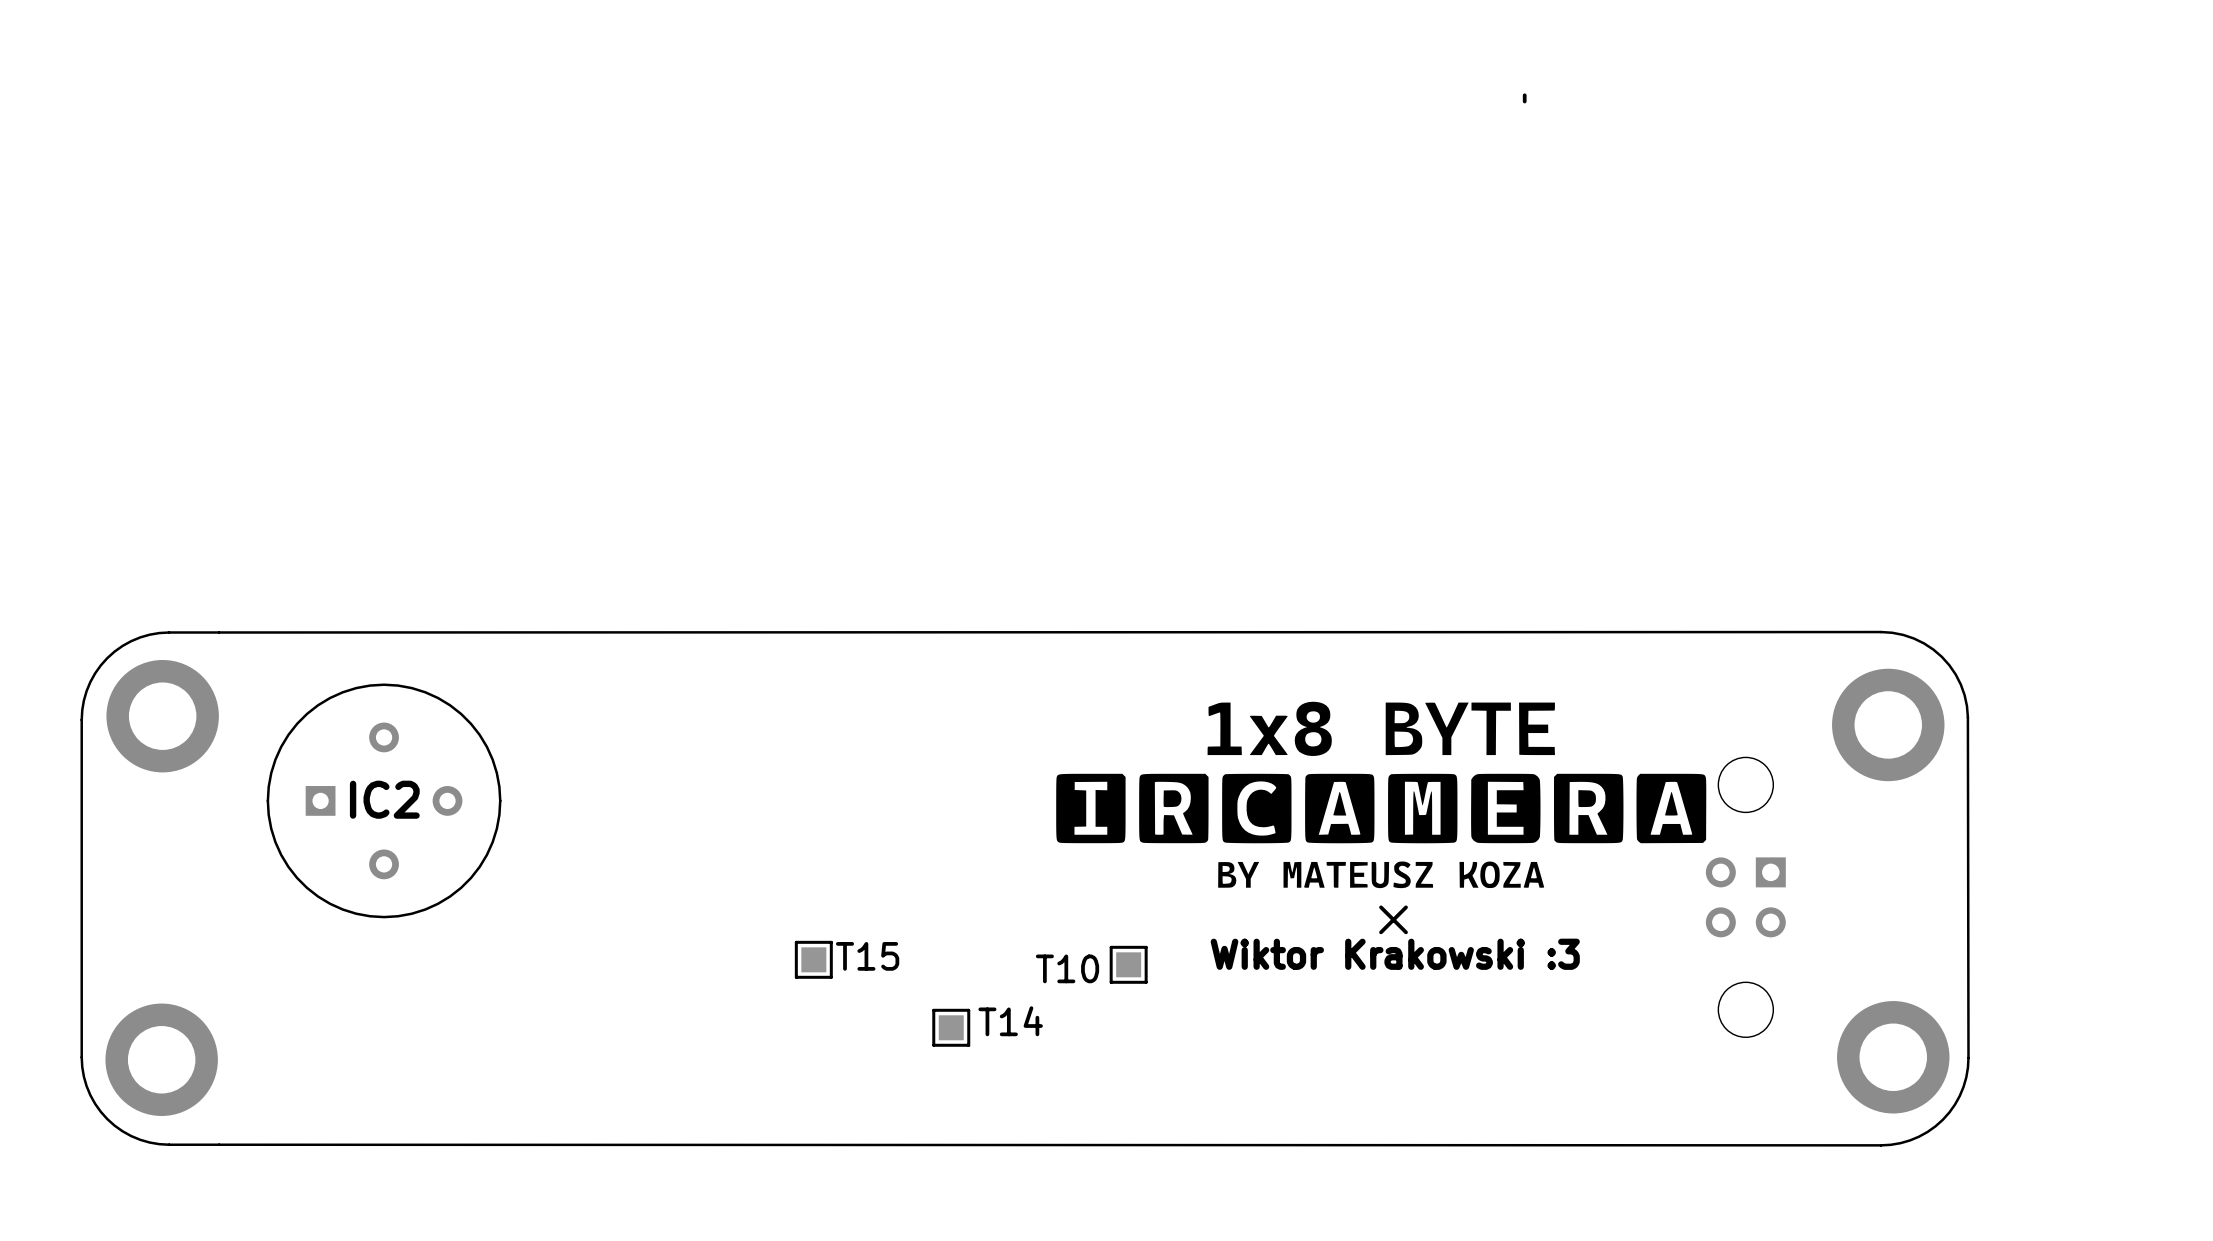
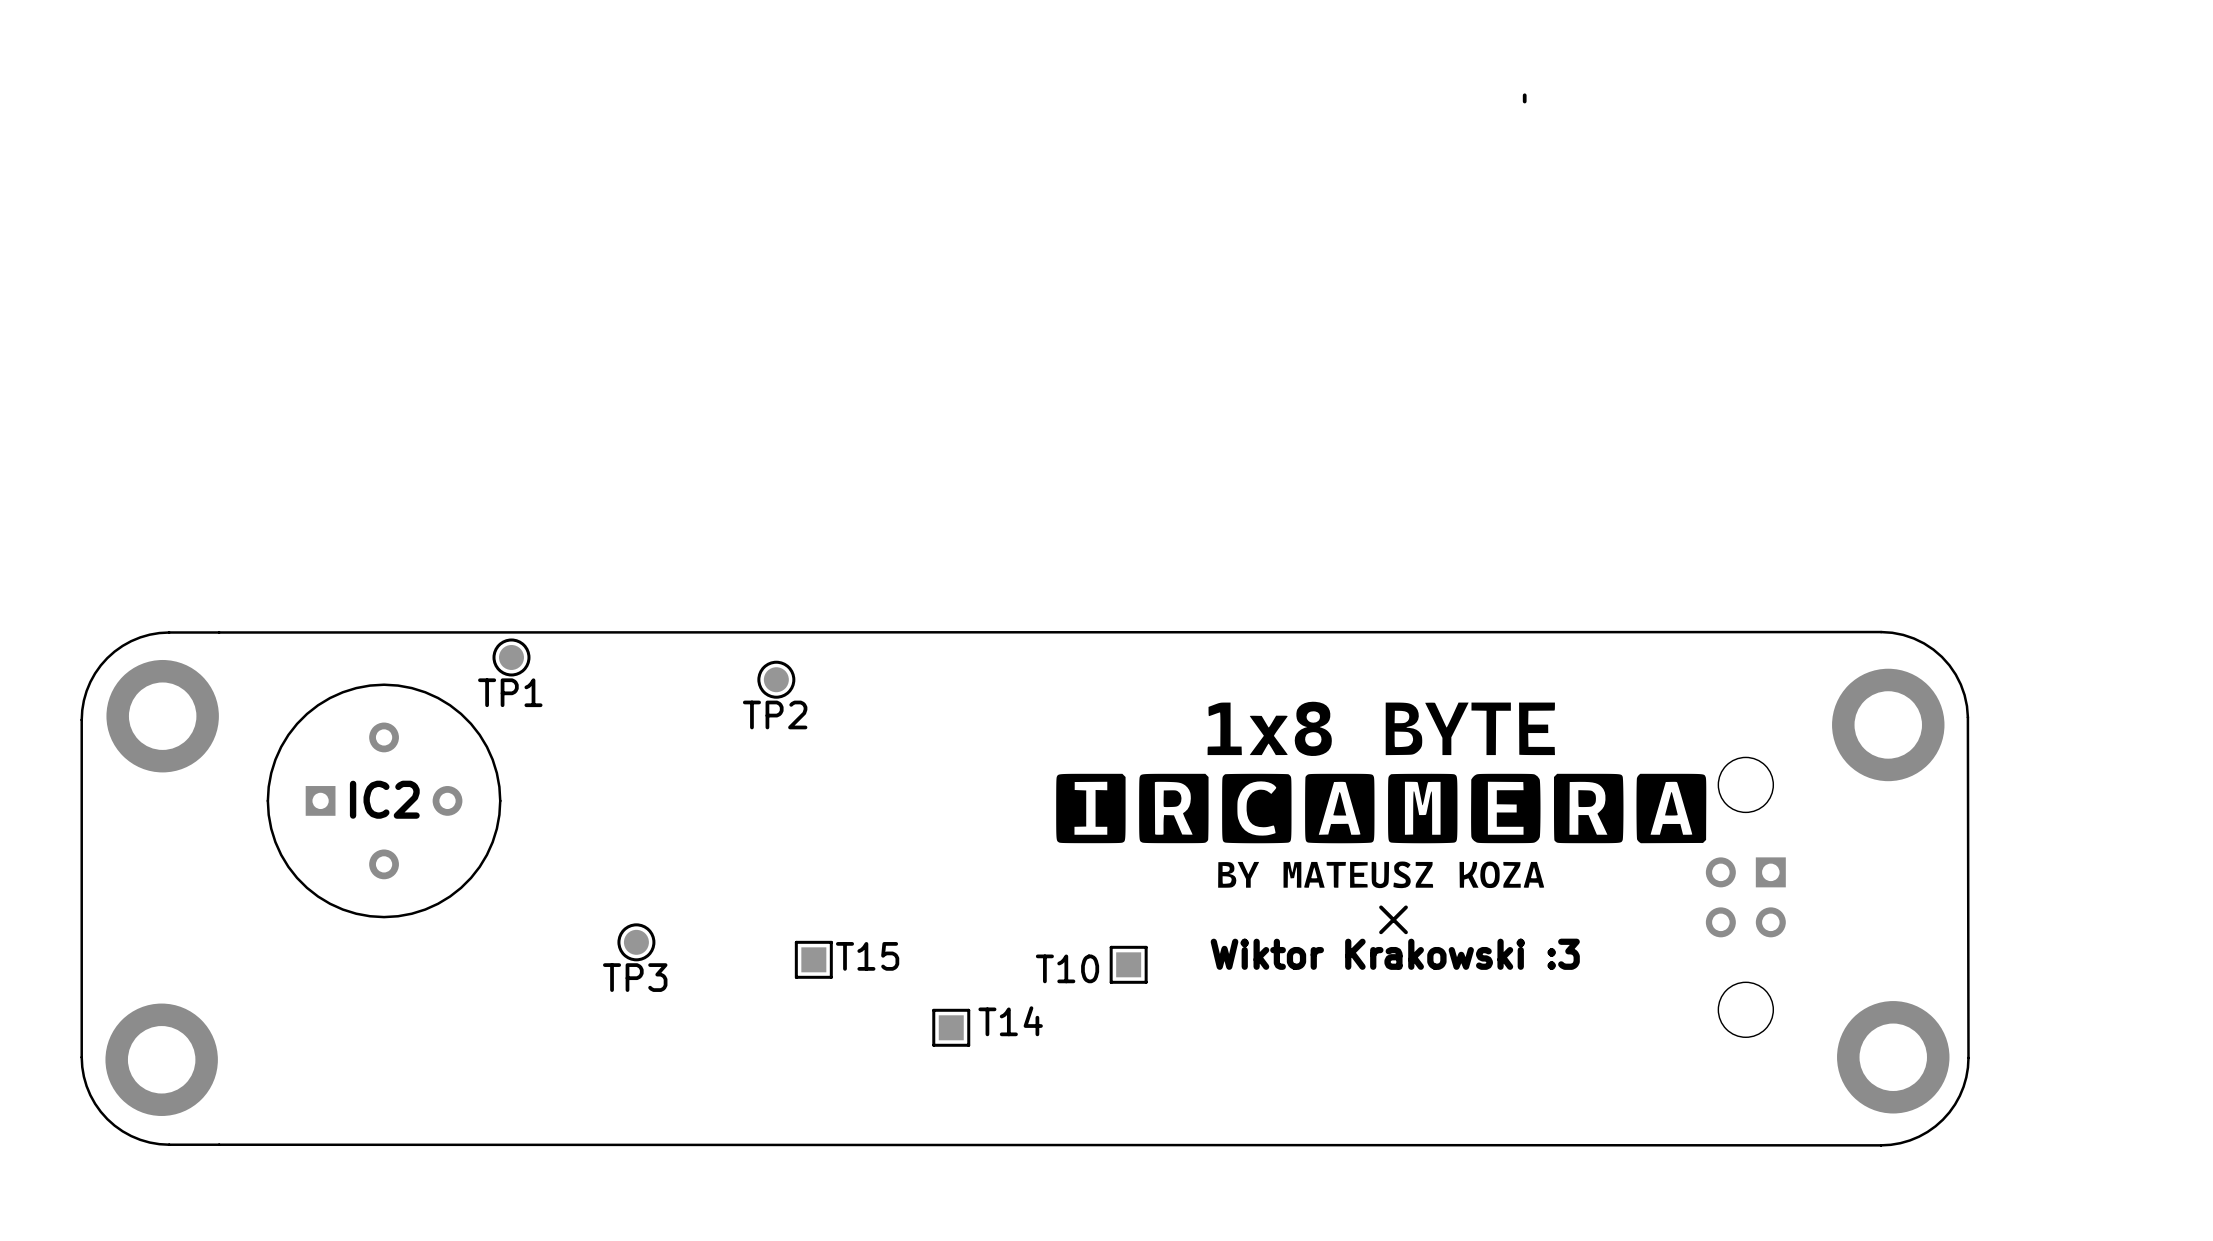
TP1: none -> (511, 657)
TP2: none -> (776, 679)
TP3: none -> (636, 942)

